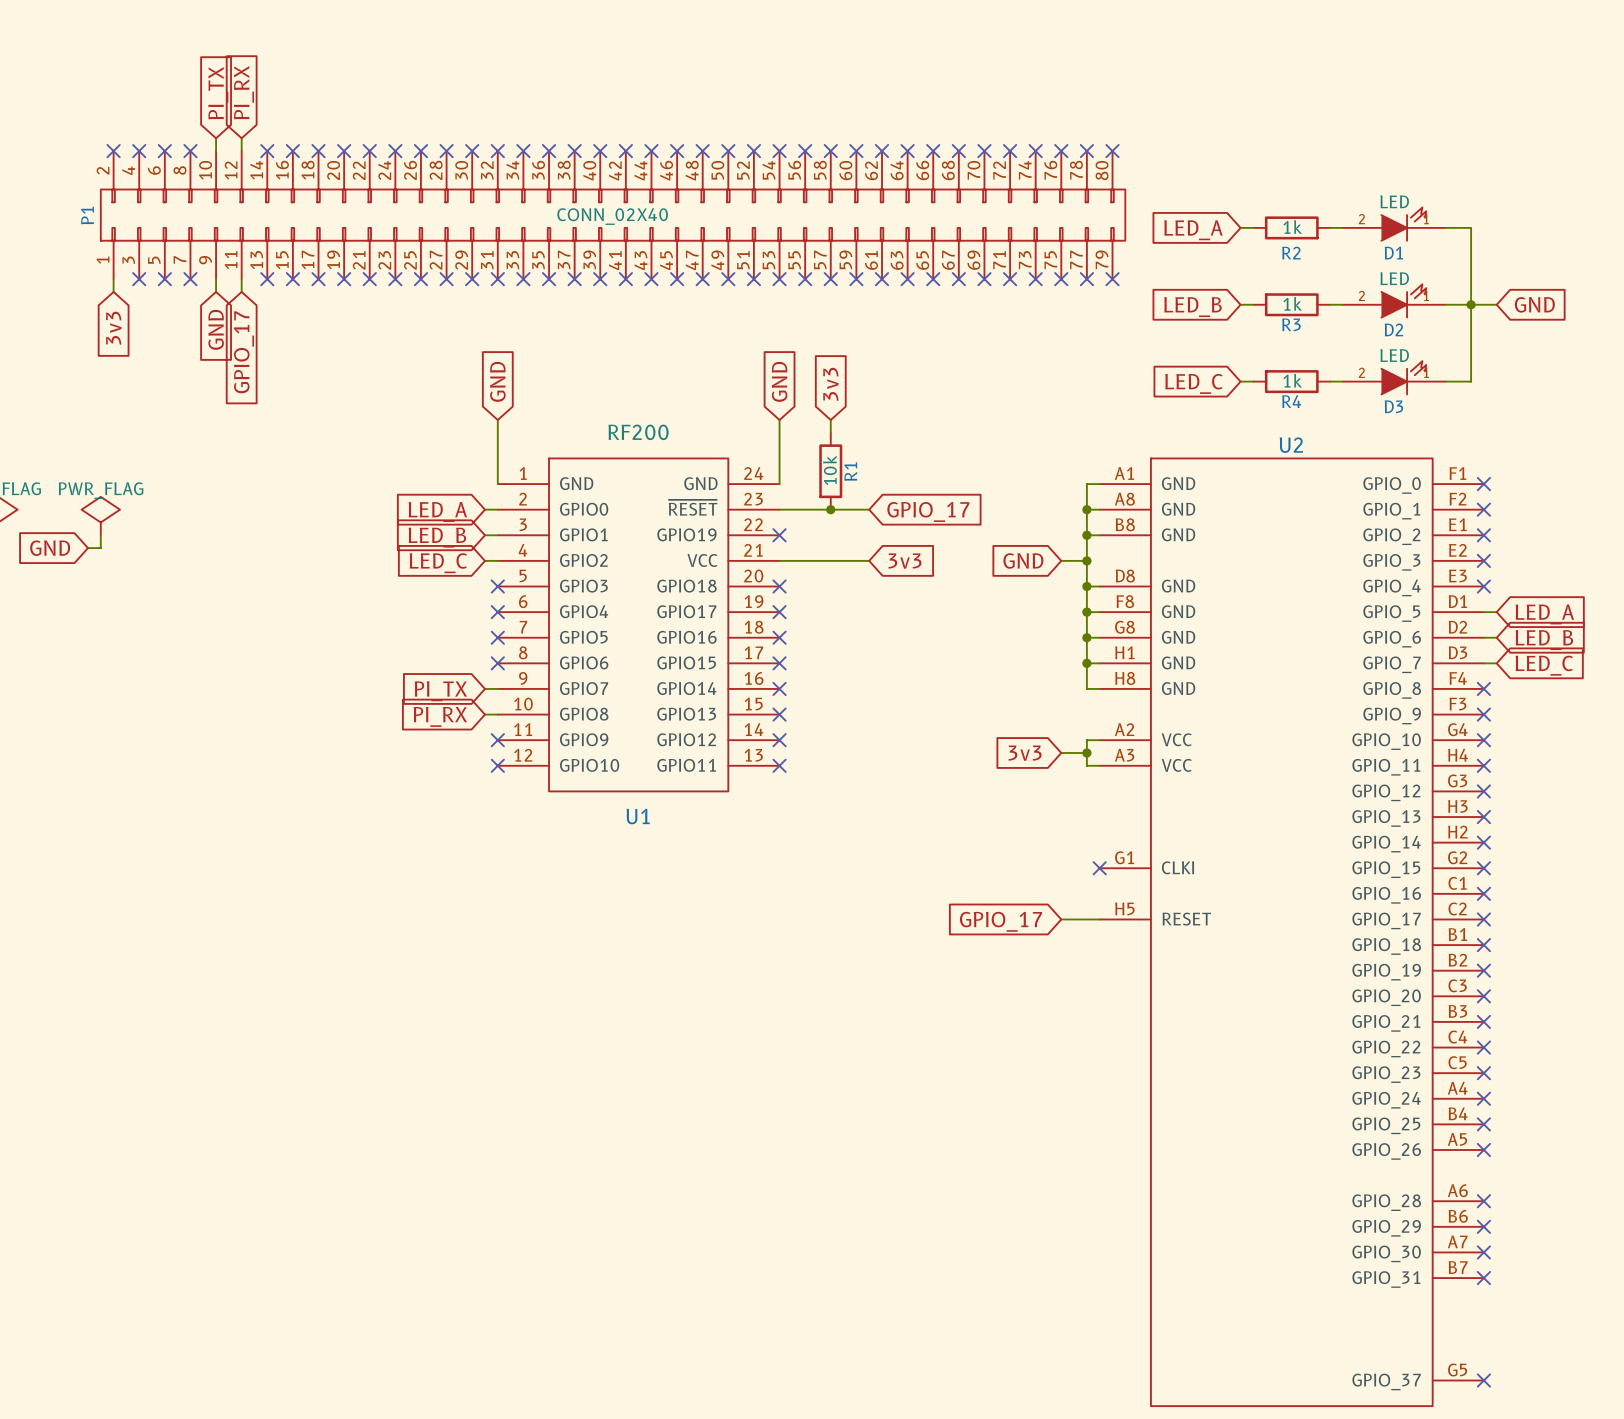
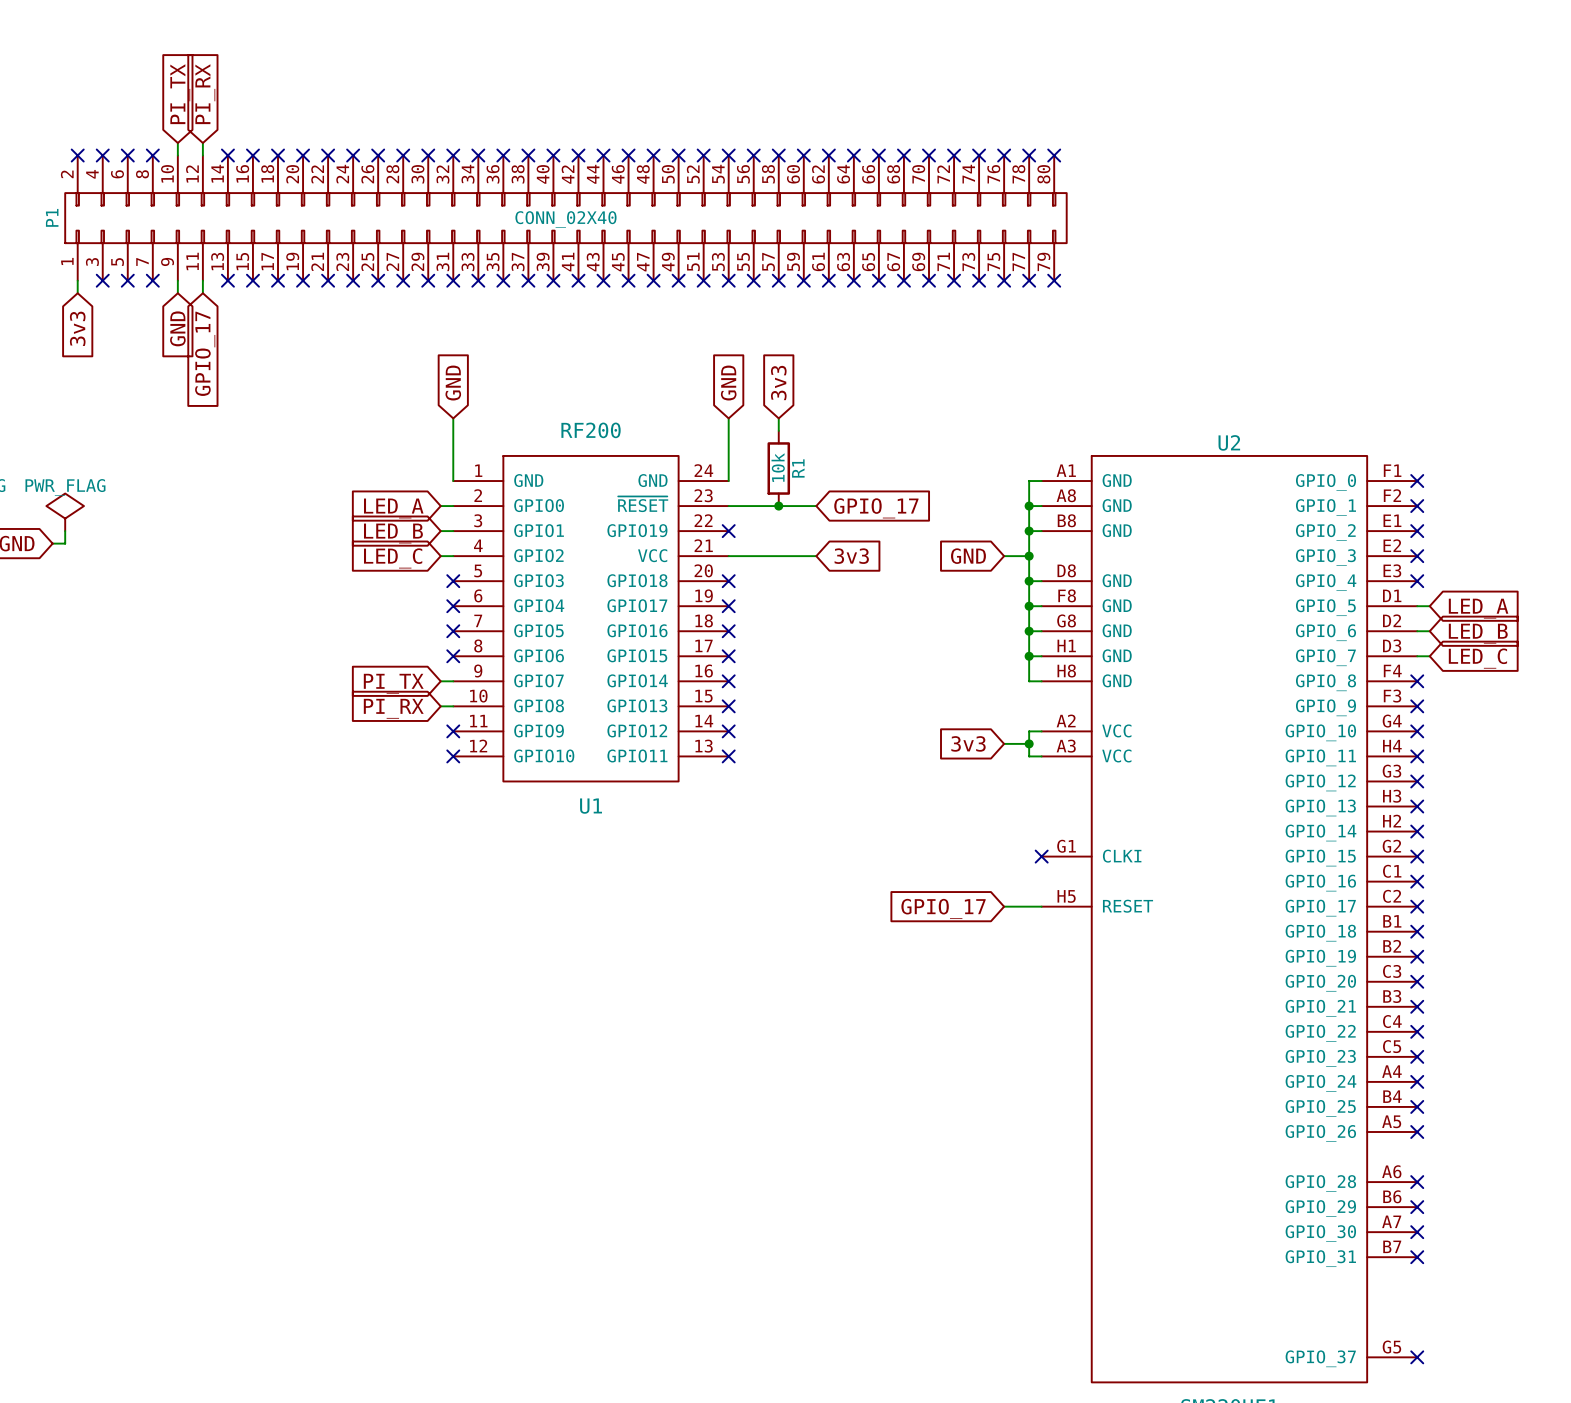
D1: LED (1394, 224) -> none
wire: (1240, 227) (1253, 227) -> none
R2: 1k (1291, 227) -> none
wire: (1330, 227) (1343, 227) -> none
wire: (1445, 227) (1471, 227) (1471, 381) (1445, 381) -> none
global label: LED_A (1193, 230) -> none
D2: LED (1394, 300) -> none
wire: (1240, 304) (1253, 304) -> none
R3: 1k (1291, 304) -> none
wire: (1330, 304) (1343, 304) -> none
wire: (1445, 304) (1496, 304) -> none
junction: (1471, 304) -> none
global label: GND (1534, 304) -> none
global label: LED_B (1192, 307) -> none
D3: LED (1394, 377) -> none
wire: (1240, 381) (1253, 381) -> none
R4: 1k (1291, 381) -> none
wire: (1330, 381) (1343, 381) -> none
global label: LED_C (1193, 383) -> none

